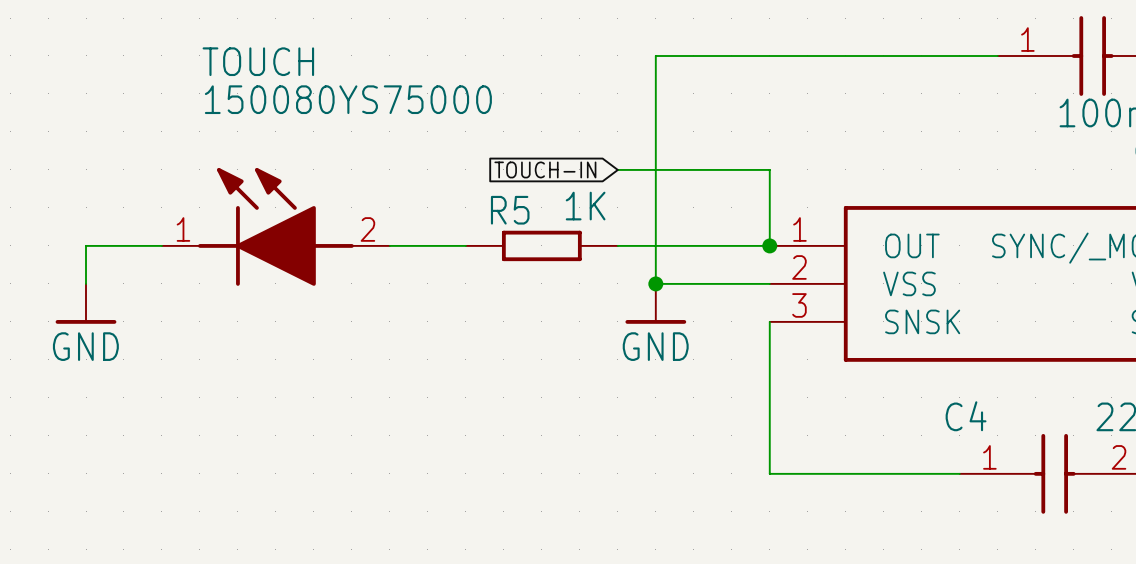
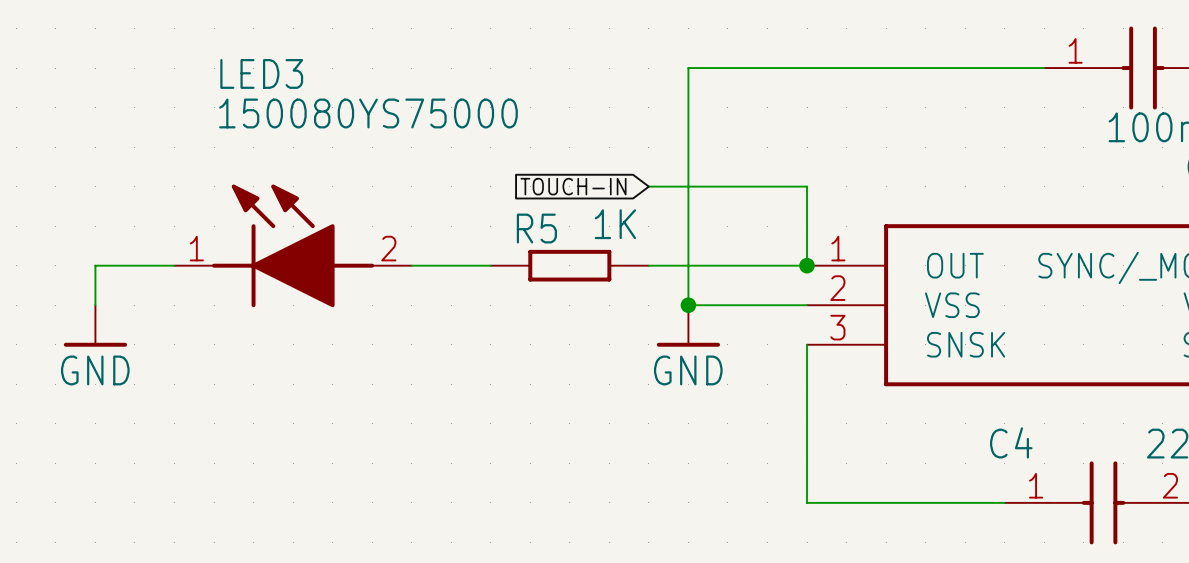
TOUCH name: TOUCH (258, 61) -> LED3 (261, 73)

